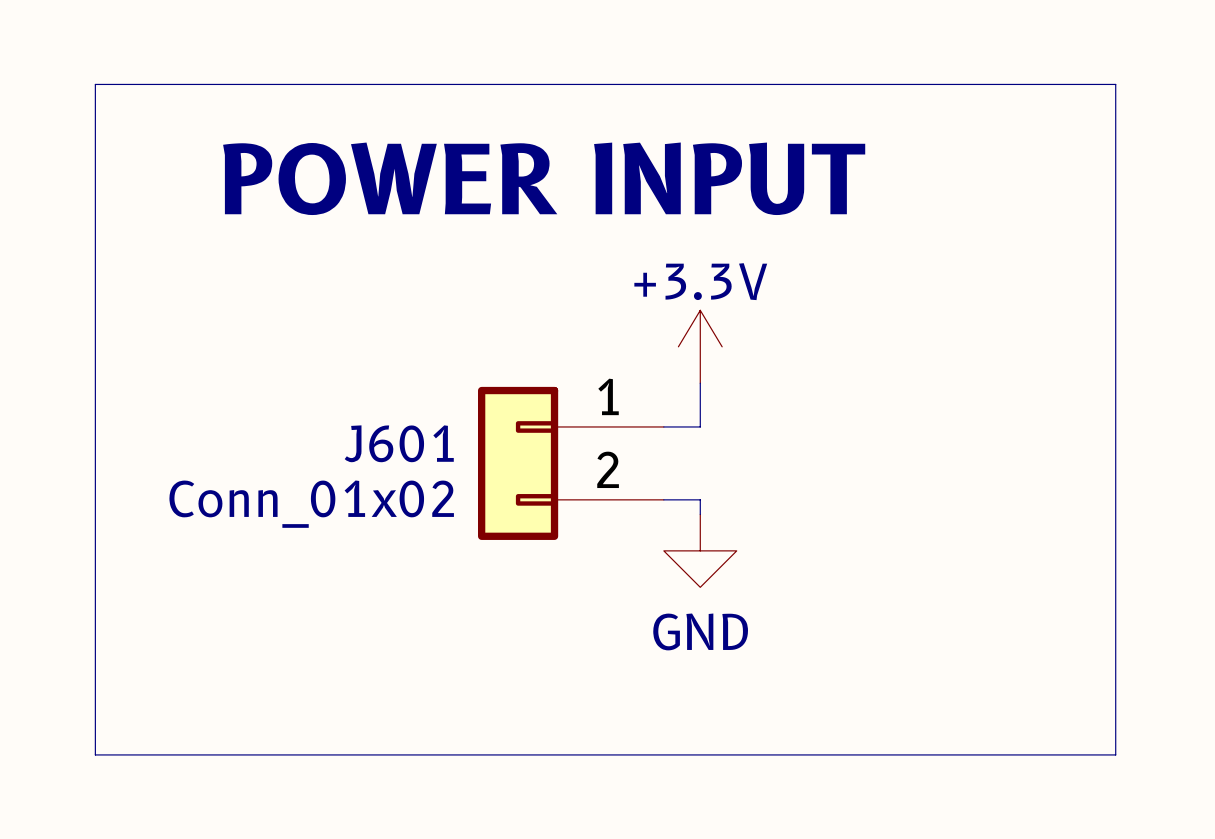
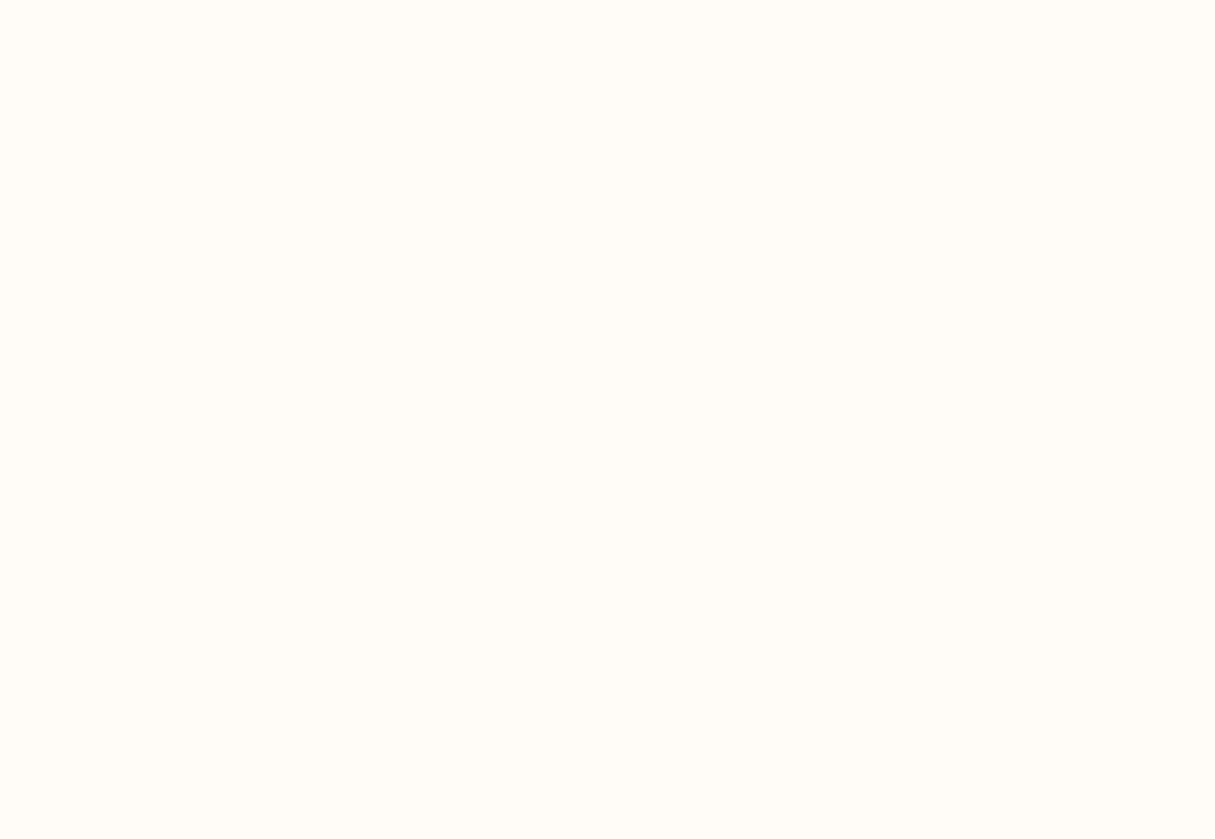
line: (95, 84) (1115, 84) (1115, 754) (95, 754) (95, 84) -> none
text: POWER INPUT (544, 178) -> none
power symbol: +3.3V (700, 346) -> none
wire: (700, 383) (700, 426) (663, 426) -> none
J601: Conn_01x02 (570, 463) -> none
wire: (663, 499) (700, 499) (700, 514) -> none
power symbol: GND (700, 550) -> none

